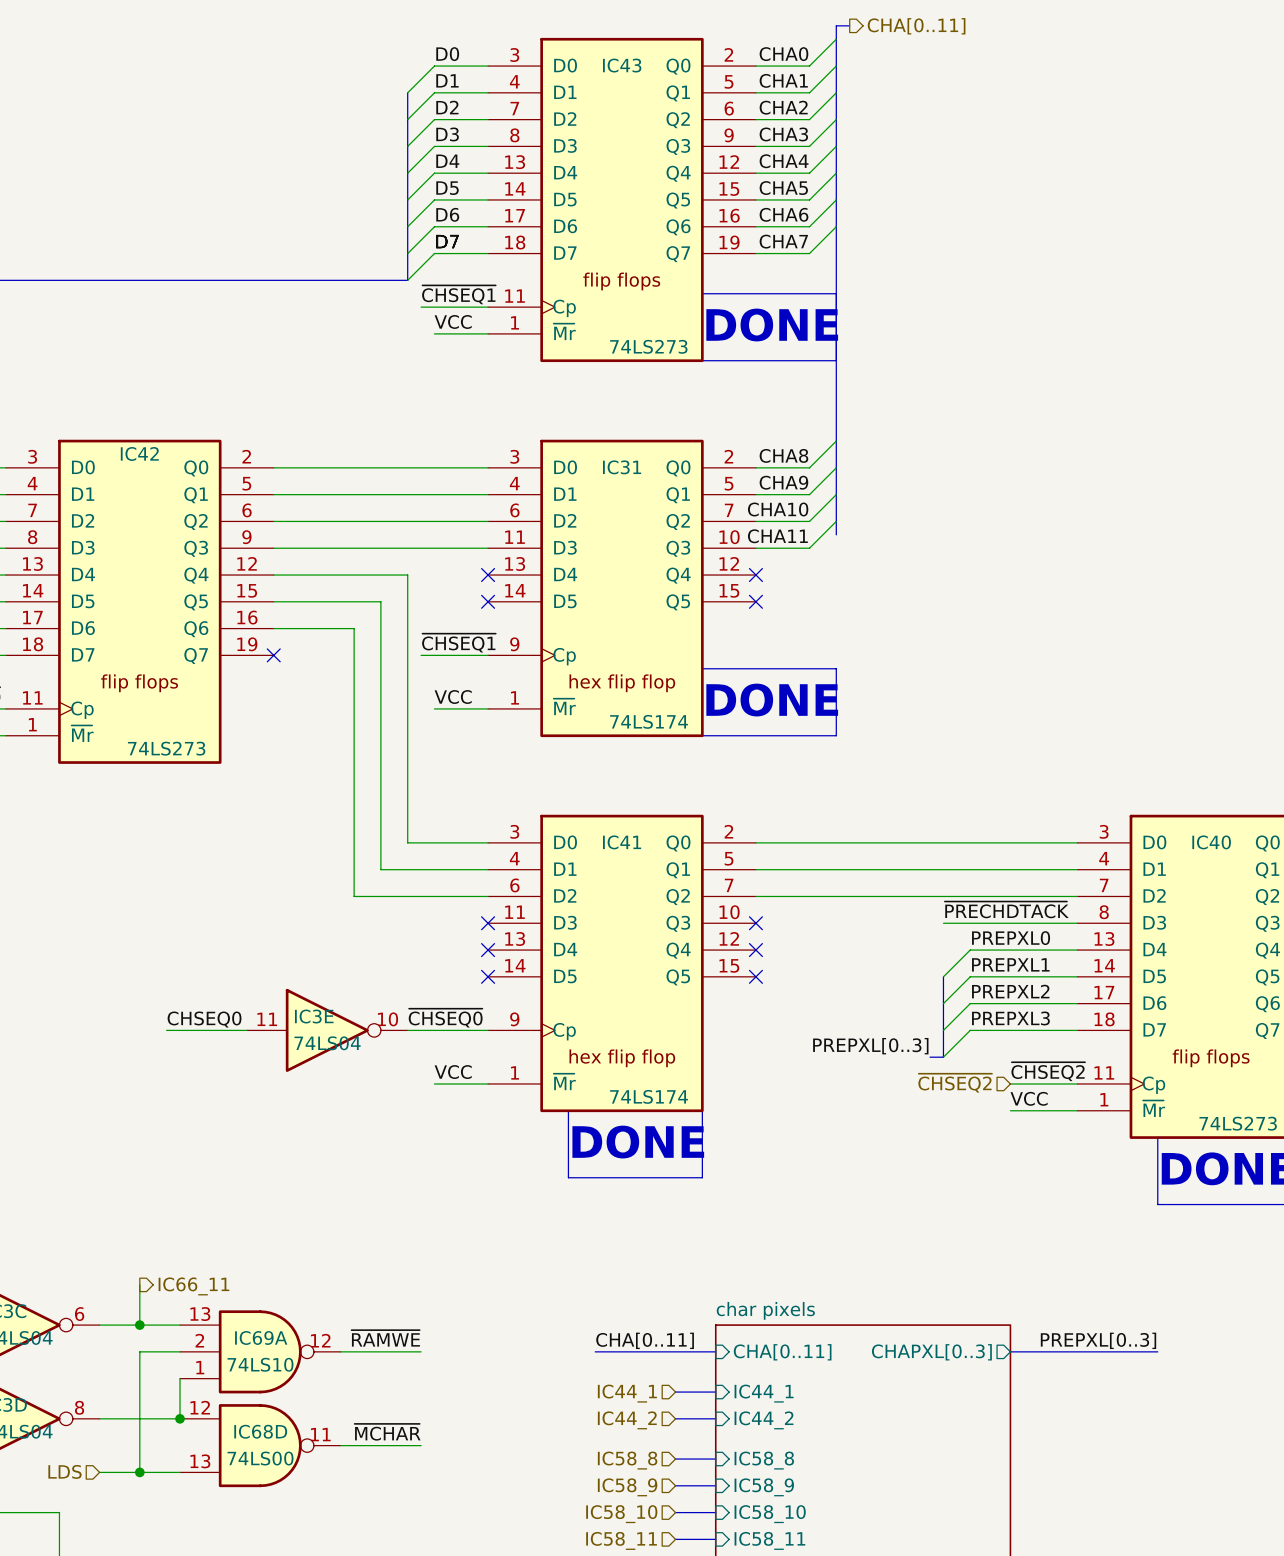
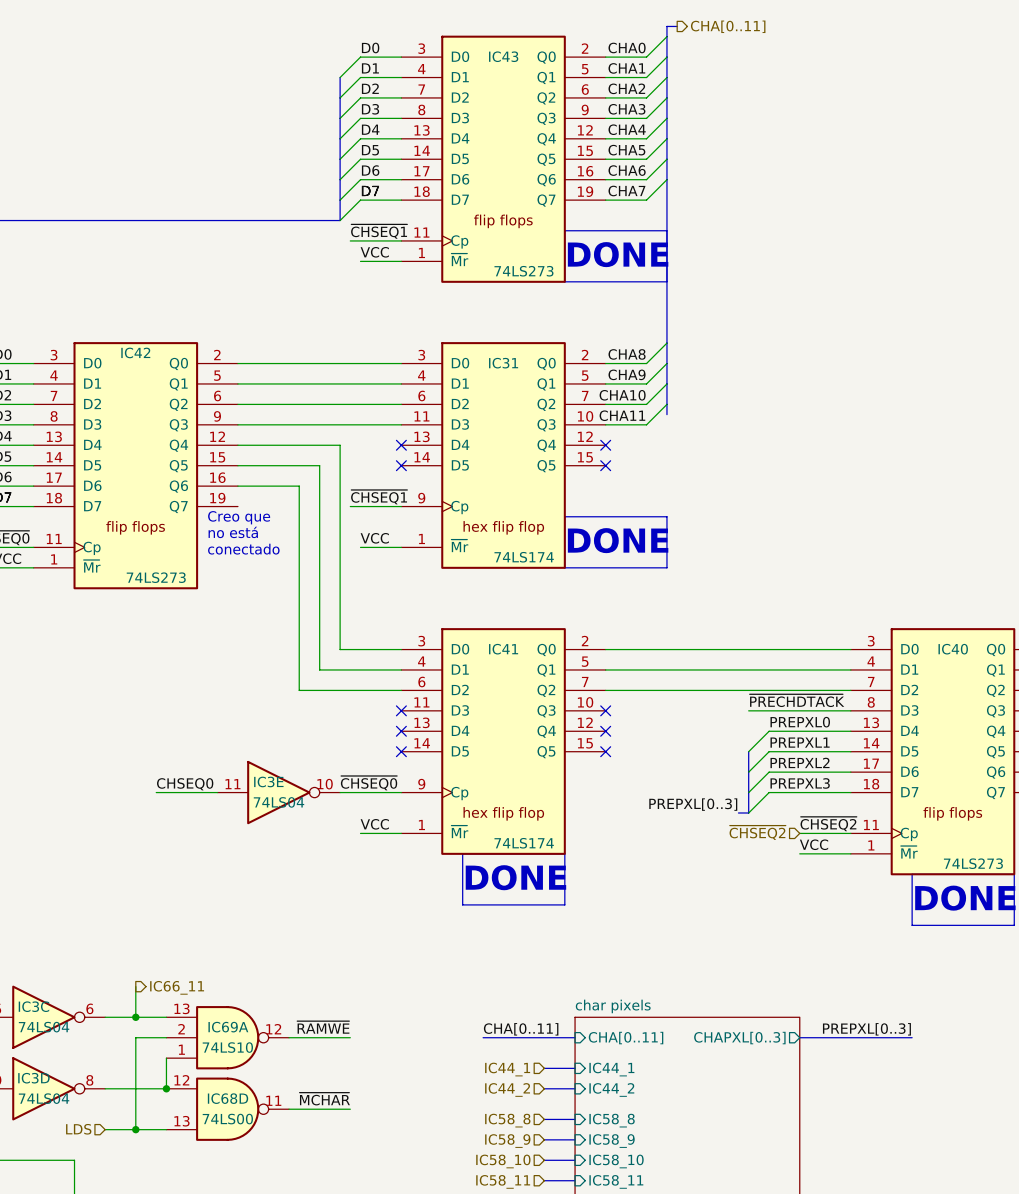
no-connect mark: (273, 655) -> none
text: none -> Creo que (239, 517)
text: none -> no está (233, 532)
text: none -> conectado (243, 549)

